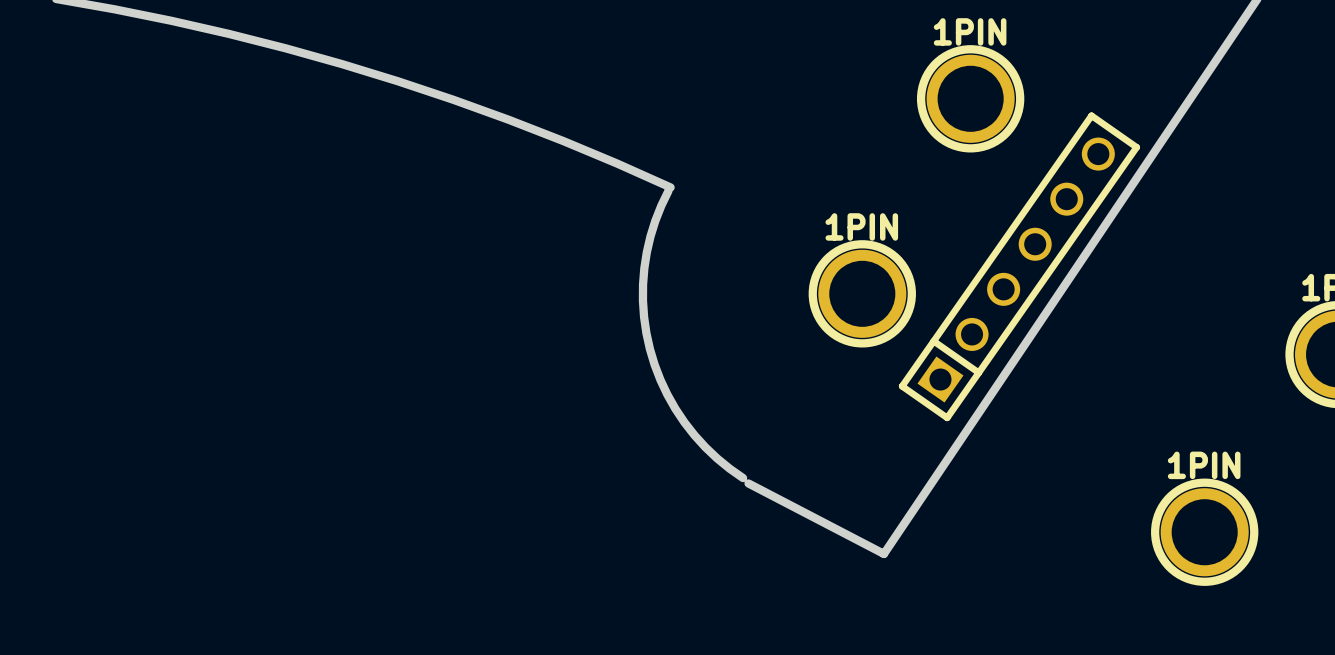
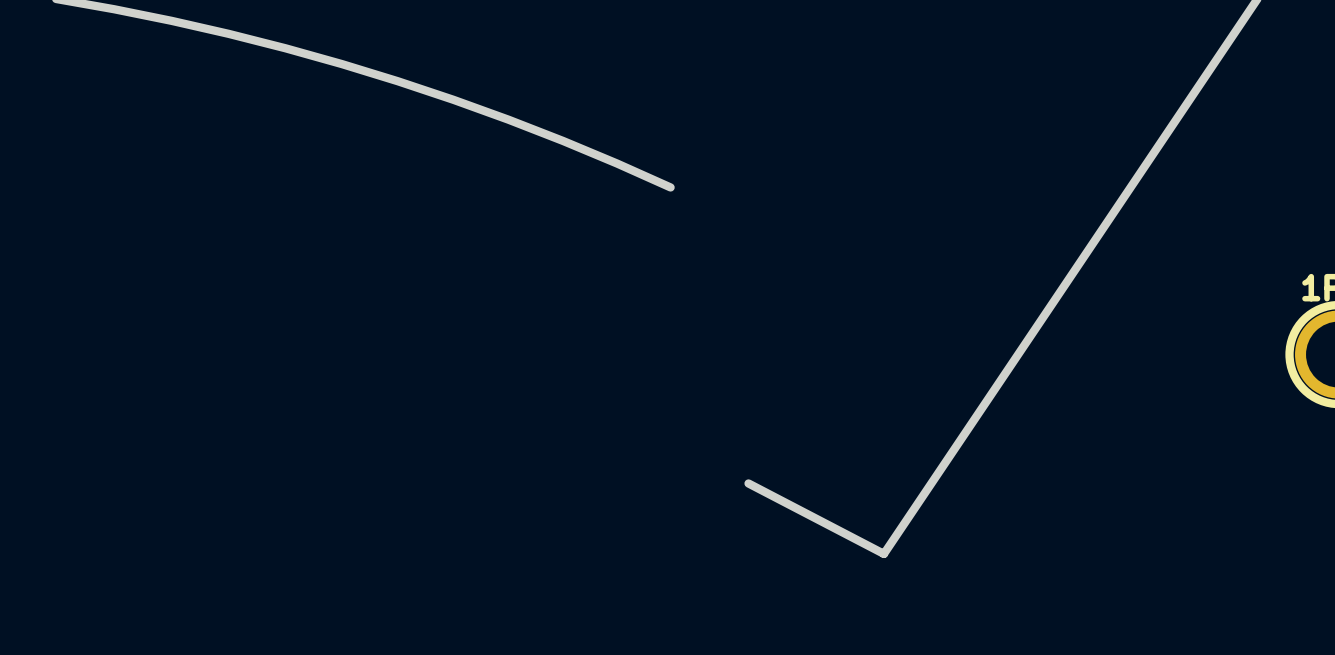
1PIN: (970, 98) -> none
board edge: (668, 191) (655, 220) (644, 268) (644, 317) (649, 349) (667, 394) (684, 422) (717, 458) (743, 478) -> none
part: (1019, 266) -> none
1PIN: (862, 293) -> none
1PIN: (1204, 532) -> none

